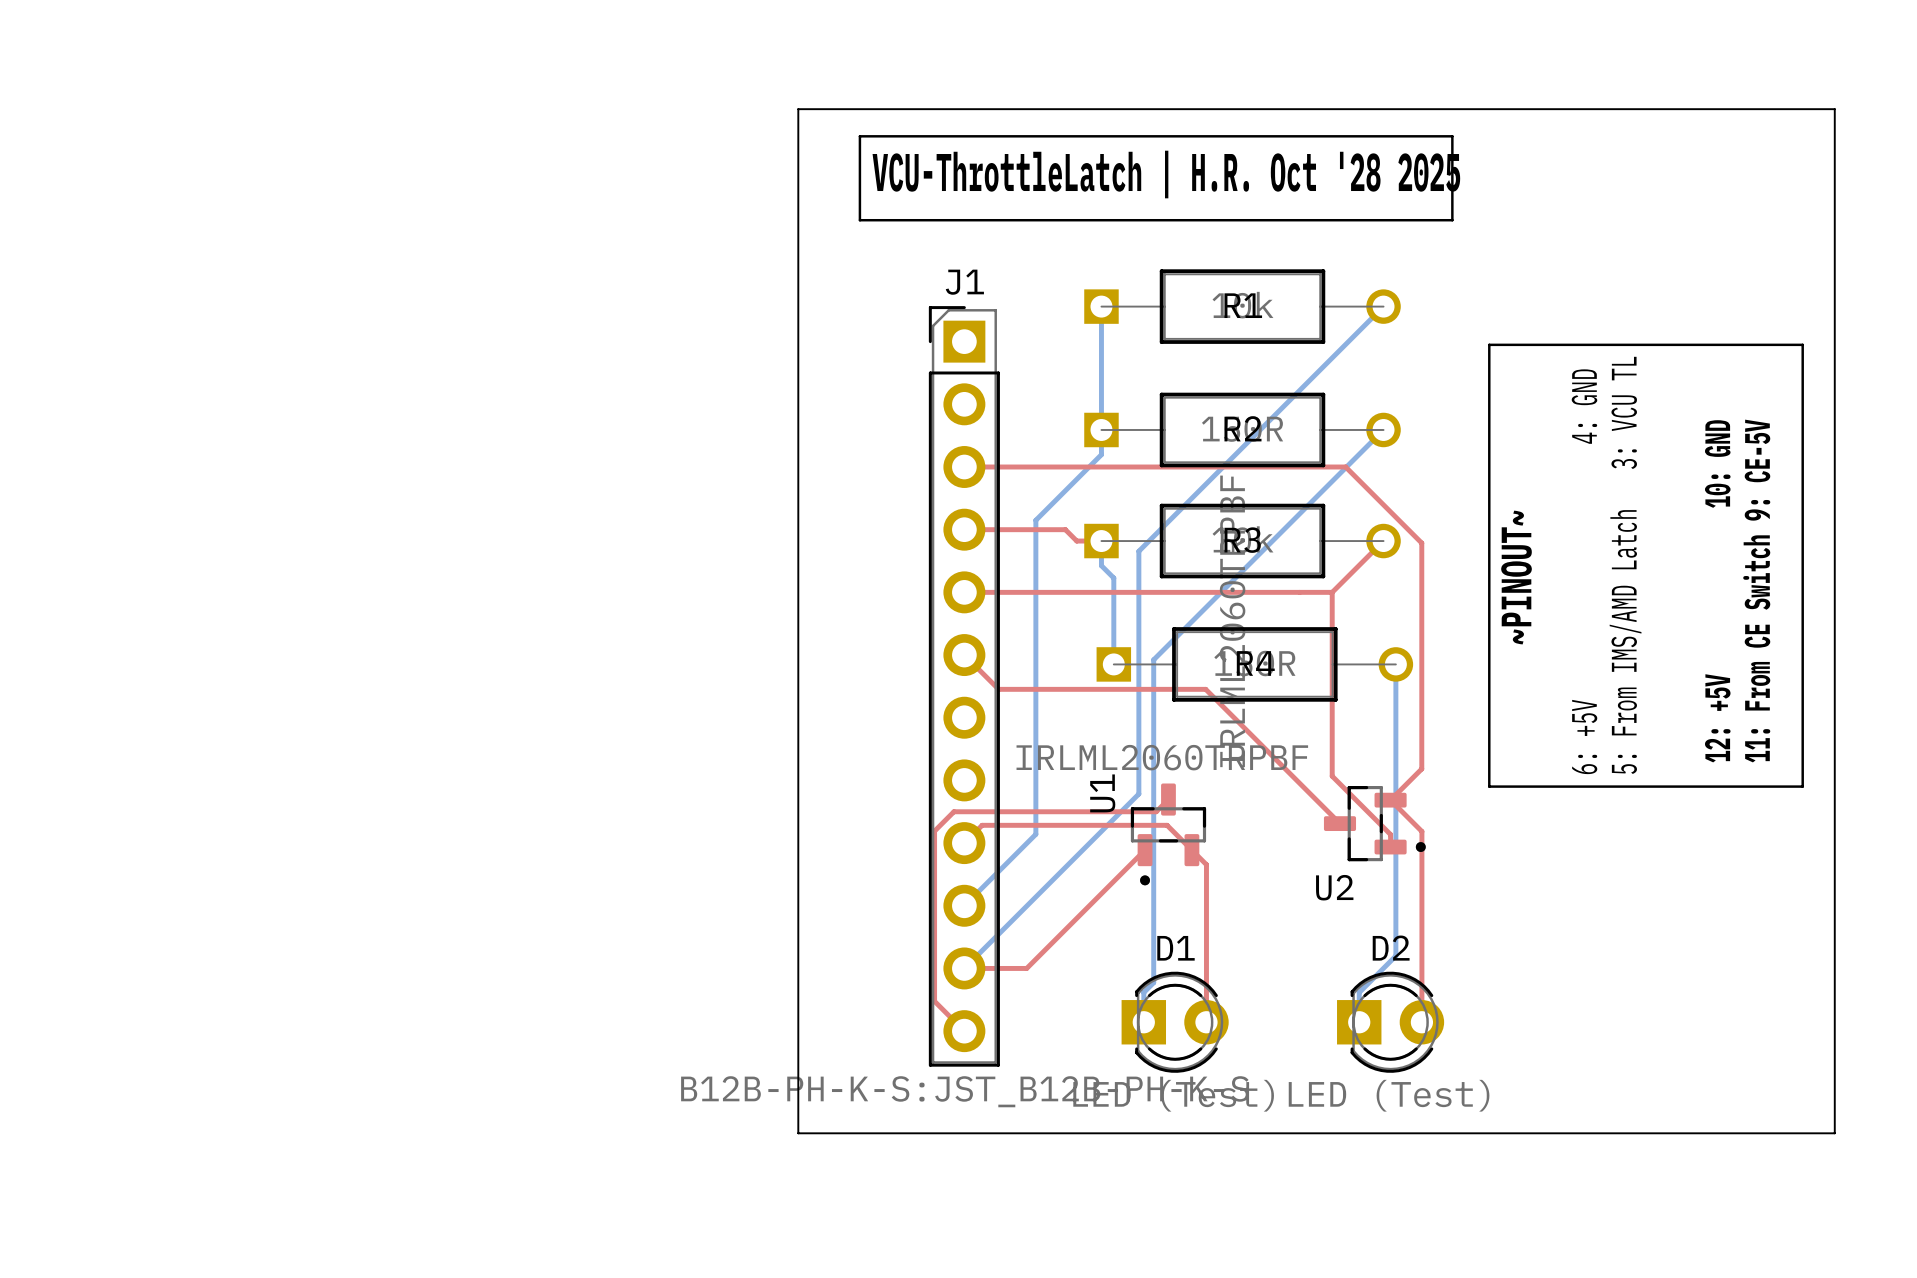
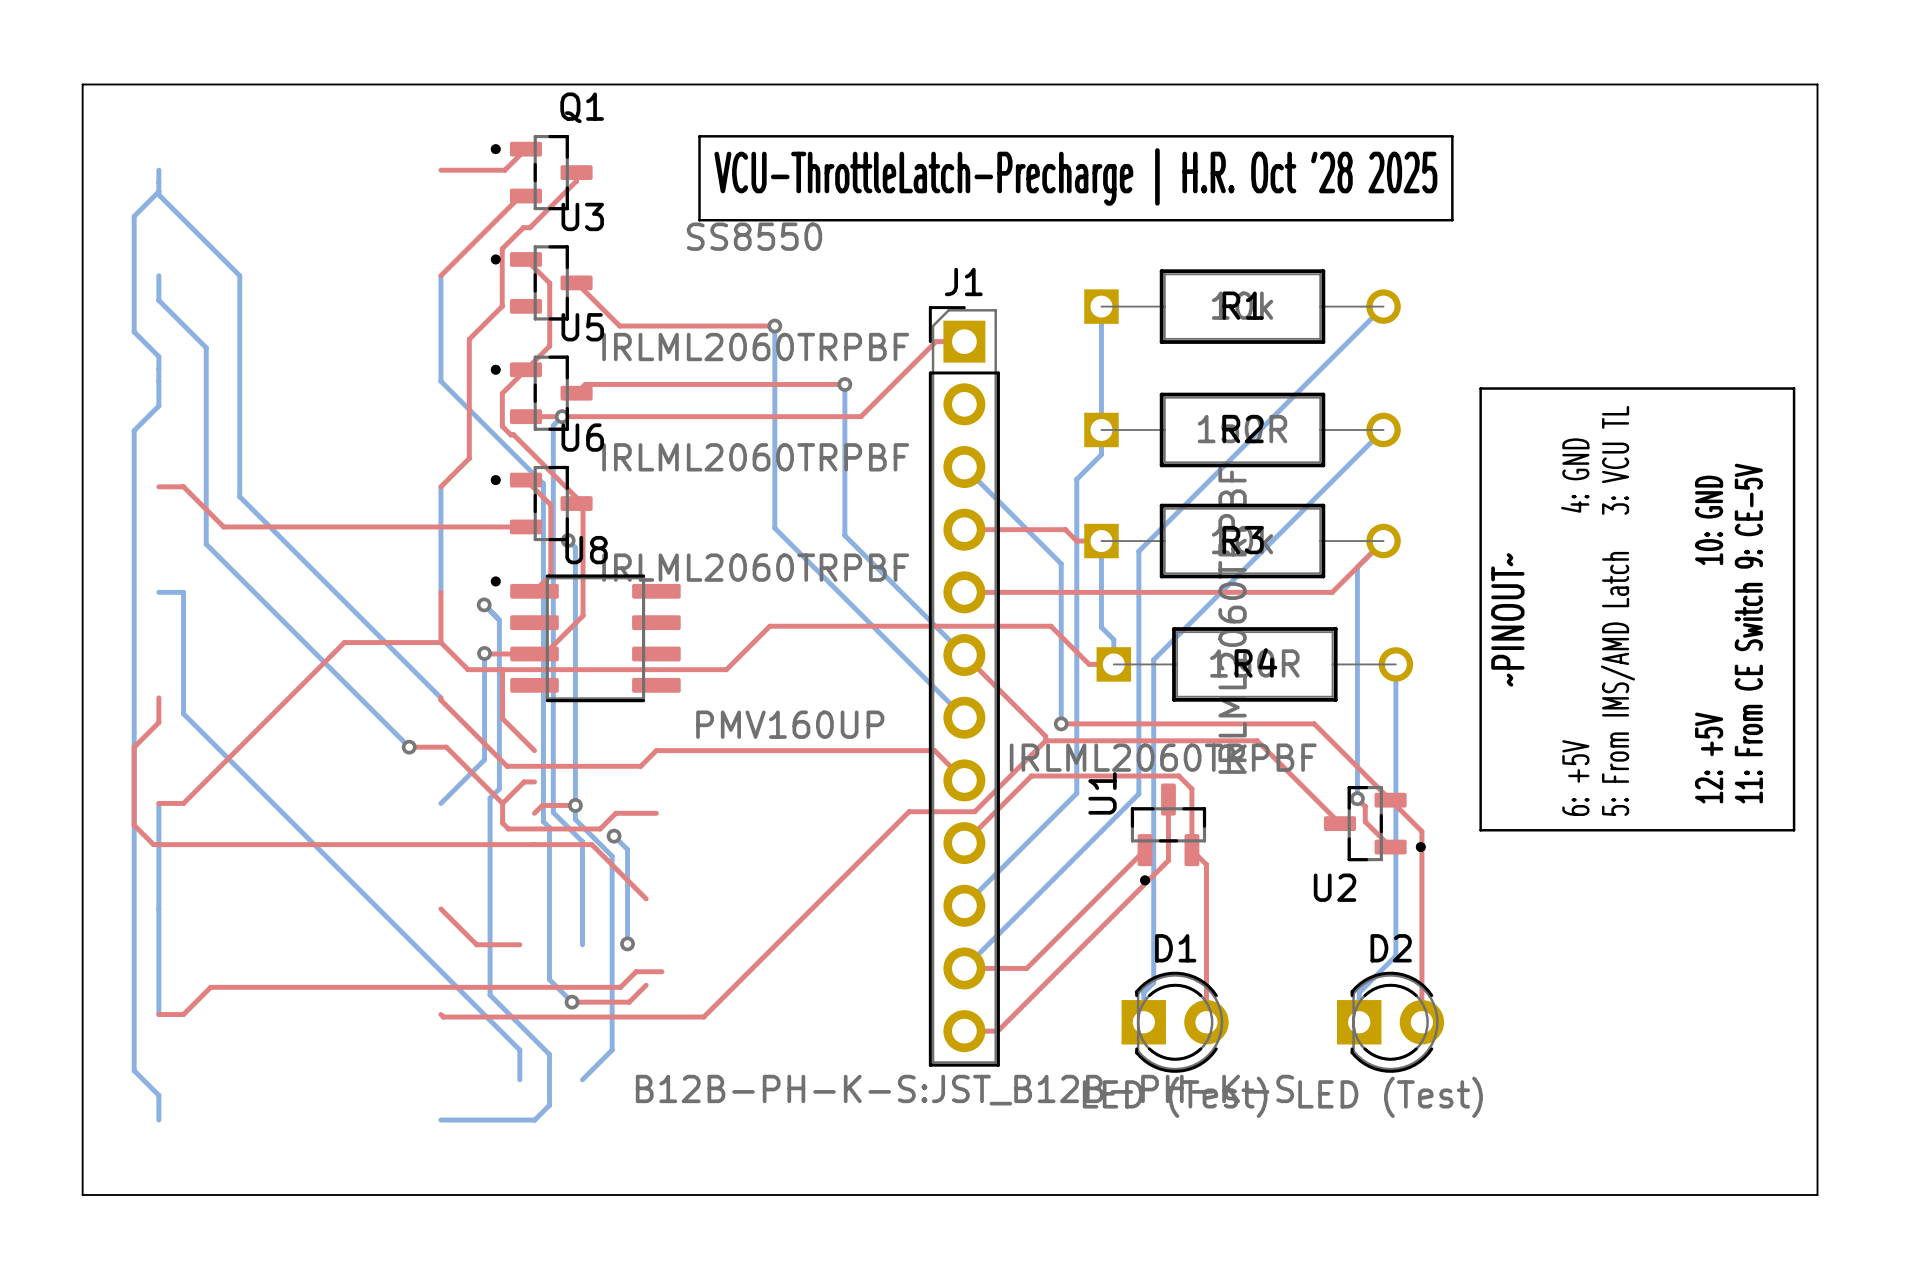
board edge: (798, 109) (1834, 109) (1834, 1133) (798, 1133) (798, 109) -> (82, 84) (82, 1195) (1817, 1195) (1817, 84) (82, 84)
line: (859, 136) (859, 220) -> (859, 136) (699, 136) (699, 220) (859, 220)
top track: none -> (525, 149) (504, 170) (440, 170)
bottom track: none -> (158, 170) (158, 194) (239, 275) (239, 496) (440, 697)
Q1: none -> SS8550 (541, 172)
top track: none -> (576, 172) (576, 181) (529, 227) (523, 227) (502, 248) (502, 306) (469, 339) (469, 458) (440, 486)
text: VCU-ThrottleLatch | H.R. Oct '28 2025 (1166, 174) -> VCU-ThrottleLatch-Precharge | H.R. Oct '28 2025 (1075, 176)
bottom track: none -> (158, 191) (134, 216) (134, 331) (158, 356) (158, 405) (134, 430) (134, 1070) (158, 1095) (158, 1120)
top track: none -> (525, 196) (520, 196) (440, 275)
top track: none -> (525, 259) (549, 283) (549, 346) (502, 393) (502, 426) (510, 434) (513, 434) (576, 497) (576, 503) (583, 509) (583, 615) (544, 654) (484, 654)
bottom track: none -> (158, 275) (158, 300) (206, 347) (206, 544) (409, 747)
bottom track: none -> (440, 275) (440, 381) (543, 483) (543, 821) (549, 827) (549, 979) (572, 1002)
U3: none -> IRLML2060TRPBF (541, 282)
top track: none -> (576, 282) (619, 326) (774, 326)
bottom track: none -> (774, 326) (774, 528) (964, 717)
via: none -> (774, 326)
top track: none -> (964, 341) (935, 341) (860, 416) (525, 416)
line: (1489, 344) (1802, 344) (1802, 786) (1489, 786) (1489, 344) -> (1480, 388) (1794, 388) (1794, 830) (1480, 830) (1480, 388)
bottom track: none -> (844, 384) (844, 535) (964, 655)
top track: none -> (844, 384) (585, 384) (576, 393)
via: none -> (844, 384)
U5: none -> IRLML2060TRPBF (541, 393)
bottom track: none -> (562, 416) (553, 425) (553, 812) (582, 841) (582, 944)
via: none -> (562, 416)
bottom track: none -> (964, 467) (1061, 563) (1061, 723)
top track: (964, 467) (1345, 467) (1421, 543) (1421, 768) (1390, 800) -> (1061, 723) (1314, 723) (1390, 800)
bottom track: (1076, 479) (1035, 520) (1035, 834) -> (1076, 479) (1076, 793) (1035, 834)
top track: none -> (525, 480) (550, 504) (550, 575) (534, 591)
top track: none -> (158, 486) (183, 486) (223, 526) (525, 526)
bottom track: none -> (440, 486) (440, 592)
U6: none -> IRLML2060TRPBF (541, 503)
bottom track: none -> (568, 540) (575, 547) (575, 819) (612, 856) (612, 1050) (582, 1079)
via: none -> (568, 540)
bottom track: none -> (1383, 541) (1357, 567) (1357, 798)
bottom track: (1101, 565) (1113, 578) (1113, 639) -> (1101, 565) (1101, 627) (1113, 639)
text position: 5: From IMS/AMD Latch 3: VCU TL (1625, 565) -> 5: From IMS/AMD Latch 3: VCU TL (1617, 610)
text position: 6: +5V 4: GND (1584, 571) -> 6: +5V 4: GND (1575, 627)
text position: ~PINOUT~ (1516, 577) -> ~PINOUT~ (1507, 619)
text position: 12: +5V 10: GND (1717, 591) -> 12: +5V 10: GND (1709, 639)
text position: 11: From CE Switch 9: CE-5V (1756, 591) -> 11: From CE Switch 9: CE-5V (1748, 633)
bottom track: none -> (158, 592) (183, 592) (183, 713) (519, 1050) (519, 1079)
top track: none -> (440, 592) (440, 642)
top track: (1332, 592) (1332, 776) (1390, 834) (1390, 847) -> (1357, 798) (1365, 806) (1365, 821) (1390, 847)
bottom track: none -> (484, 604) (499, 620) (499, 788) (490, 798) (490, 995) (549, 1054) (549, 1105) (534, 1120) (440, 1120)
via: none -> (484, 604)
U8: none -> PMV160UP (585, 638)
top track: none -> (440, 642) (468, 669) (726, 669) (769, 626) (1050, 626) (1089, 664) (1113, 664)
top track: none -> (440, 642) (344, 642) (183, 803) (158, 803)
bottom track: none -> (484, 653) (484, 759) (440, 803)
via: none -> (484, 653)
top track: none -> (502, 669) (502, 718) (534, 750)
top track: (998, 689) (1205, 689) (1257, 740) -> (1045, 740) (1257, 740)
top track: none -> (998, 689) (1045, 736) (1045, 740)
top track: none -> (158, 697) (158, 722) (134, 747) (134, 825) (153, 844) (591, 844) (646, 898)
top track: none -> (440, 697) (440, 700) (507, 766) (640, 766) (656, 750) (934, 750) (964, 780)
via: none -> (1061, 723)
top track: none -> (409, 747) (446, 747) (502, 803)
via: none -> (409, 747)
top track: none -> (534, 781) (524, 781) (502, 803)
via: none -> (1357, 798)
top track: (1168, 799) (1156, 811) (974, 811) -> (1045, 740) (974, 811)
bottom track: none -> (158, 803) (158, 1014)
top track: none -> (502, 803) (502, 823) (508, 828) (600, 828) (615, 813) (656, 813)
top track: none -> (575, 805) (542, 805) (534, 813)
via: none -> (575, 805)
top track: (953, 811) (934, 831) (934, 1001) (964, 1031) -> (1168, 799) (1168, 860) (997, 1031) (964, 1031)
top track: none -> (953, 811) (909, 811) (703, 1017) (443, 1017) (440, 1014)
top track: (982, 825) (1167, 825) (1191, 850) -> (982, 825) (1031, 776) (1178, 776) (1191, 789) (1191, 850)
bottom track: none -> (614, 836) (627, 849) (627, 943)
via: none -> (614, 836)
top track: none -> (440, 908) (476, 944) (519, 944)
via: none -> (627, 943)
top track: none -> (661, 971) (636, 971) (620, 987) (210, 987) (183, 1014) (158, 1014)
top track: none -> (646, 985) (629, 1002) (572, 1002)
via: none -> (572, 1002)

